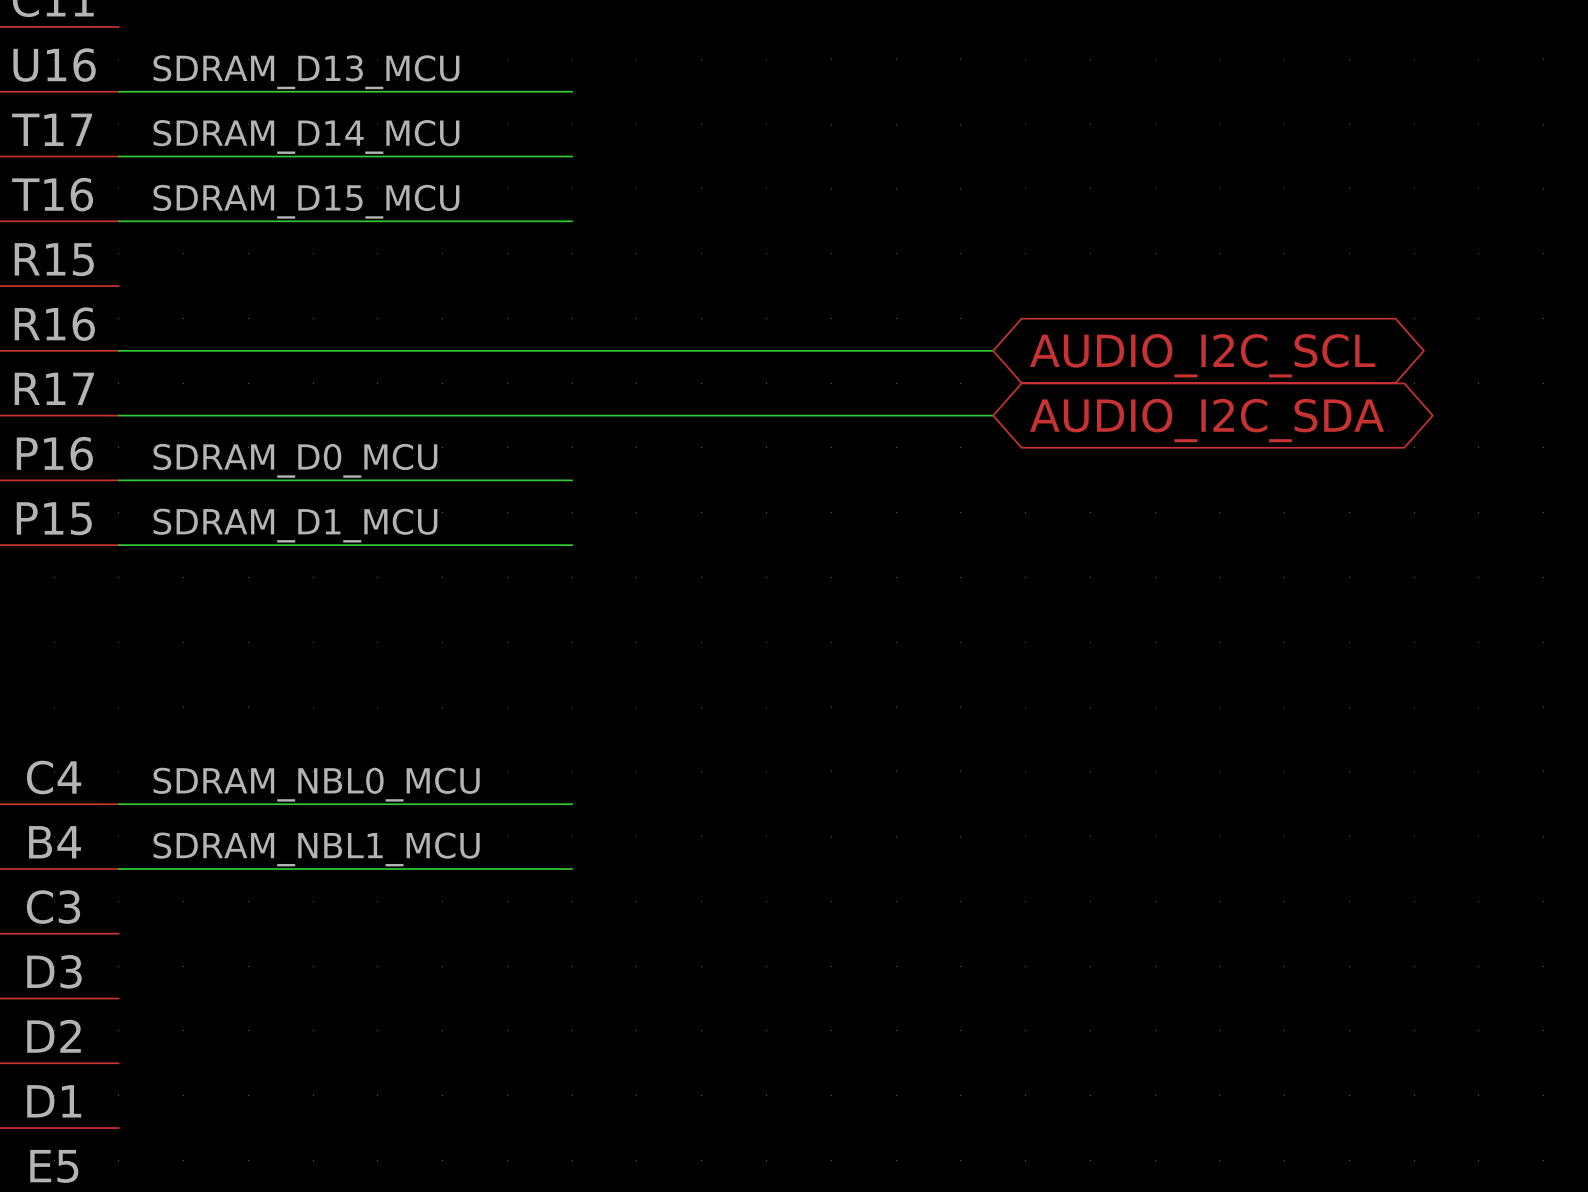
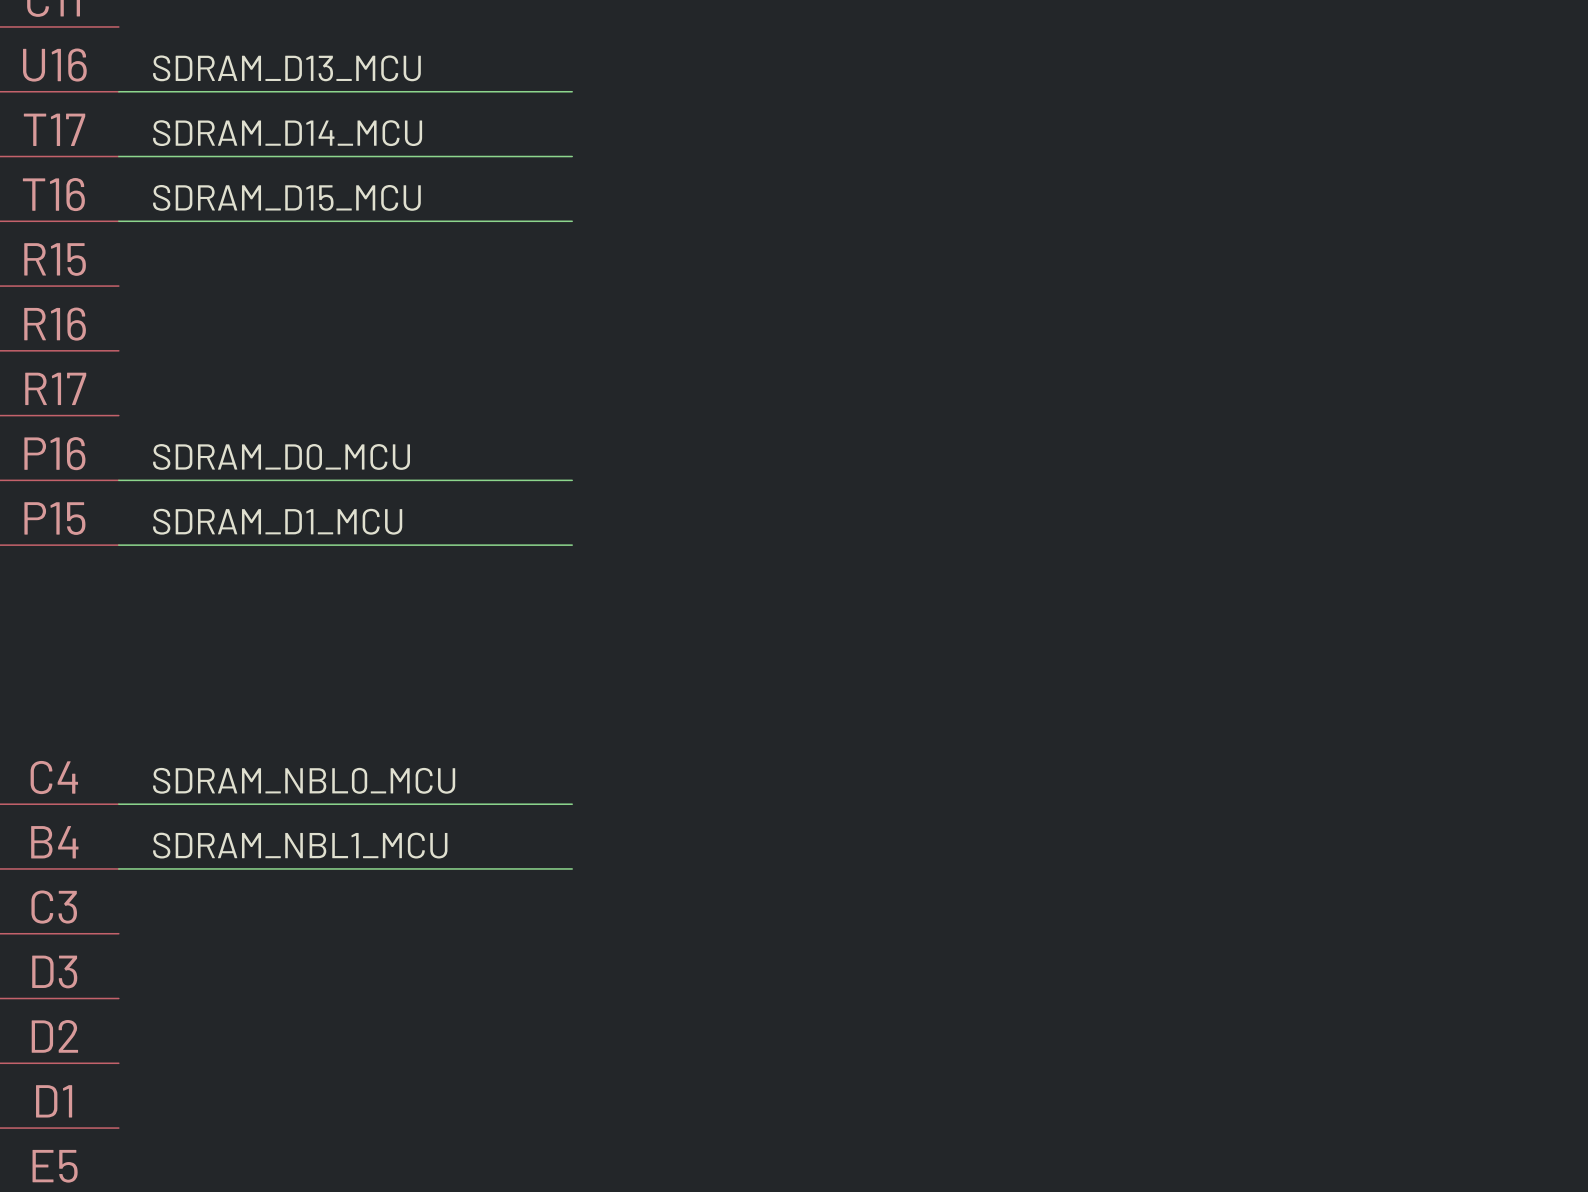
wire: (118, 350) (993, 350) -> none
global label: AUDIO_I2C_SCL (1202, 355) -> none
wire: (118, 415) (993, 415) -> none
global label: AUDIO_I2C_SDA (1207, 420) -> none

